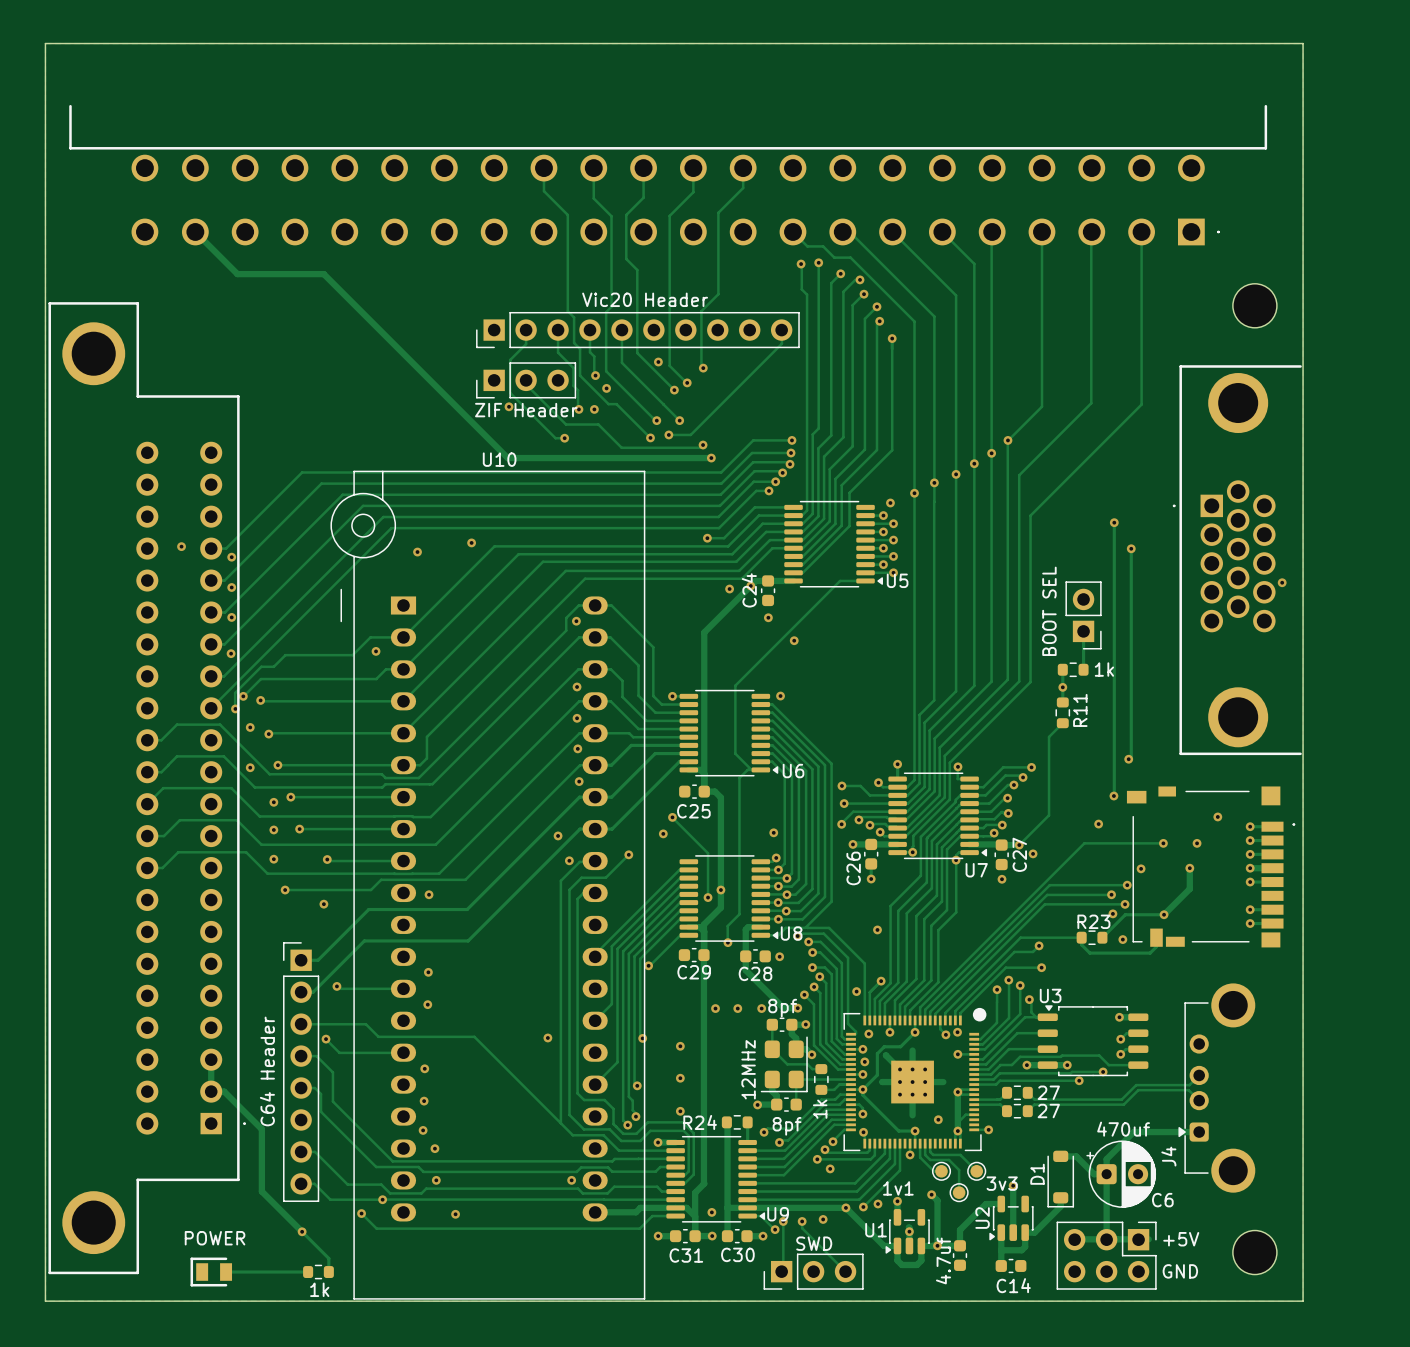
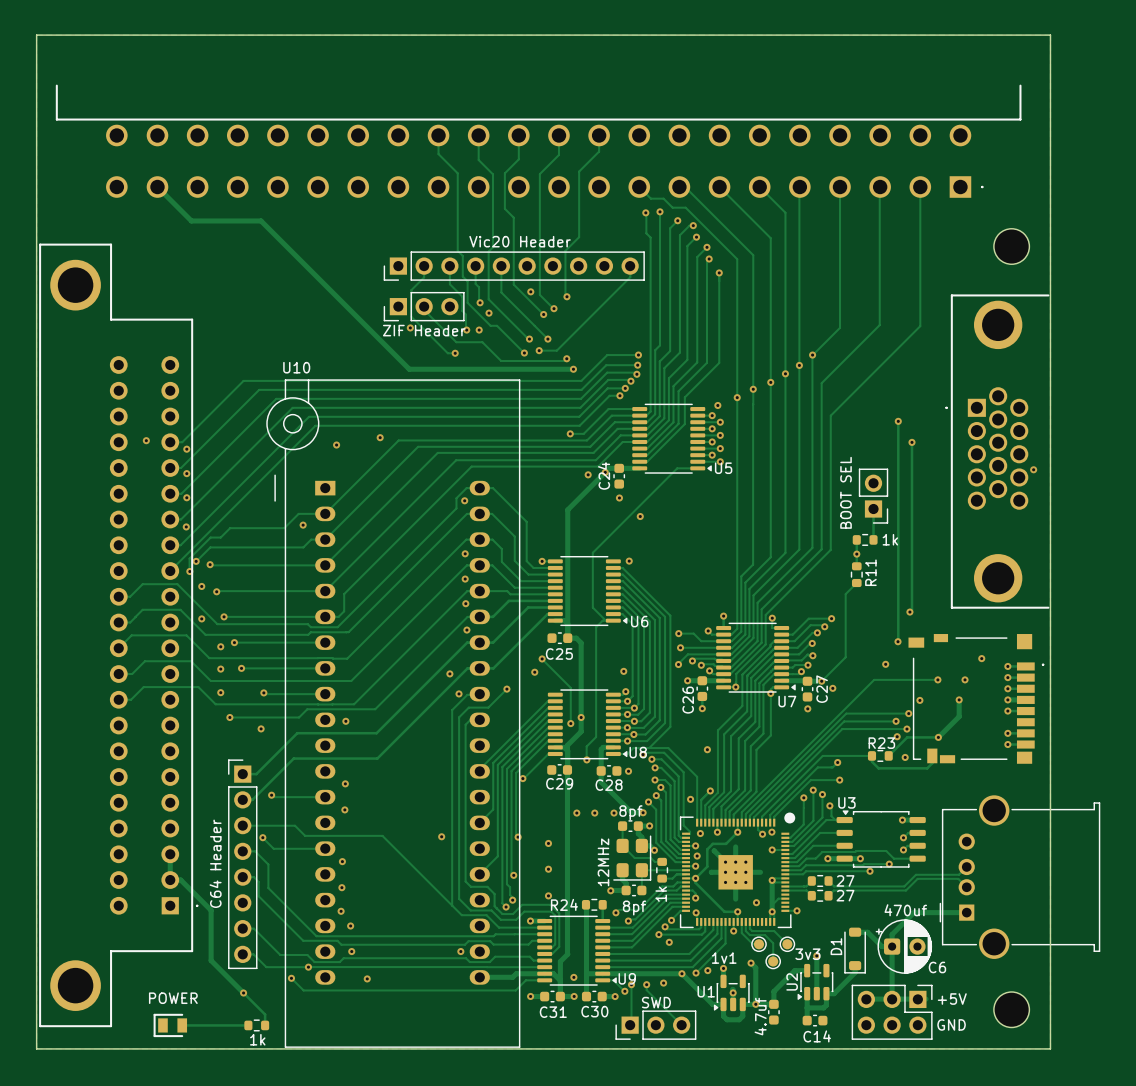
U10 name position: U10 (499, 459) -> U10 (296, 367)
J4: (1216, 1088) -> none
part: none -> (1019, 877)

